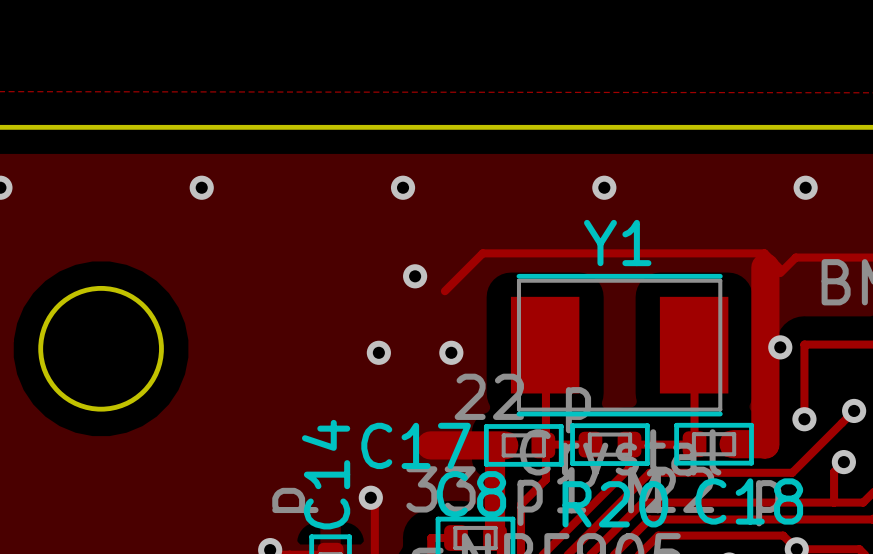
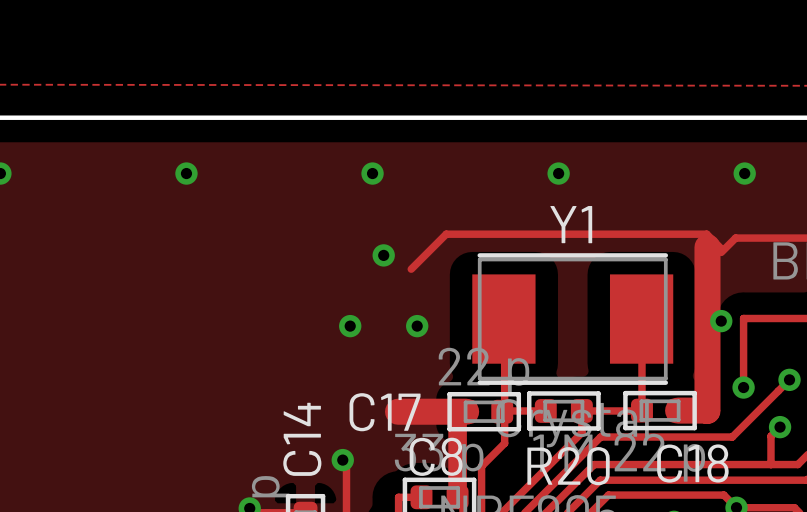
round board edge: [38, 285, 164, 412] -> none

